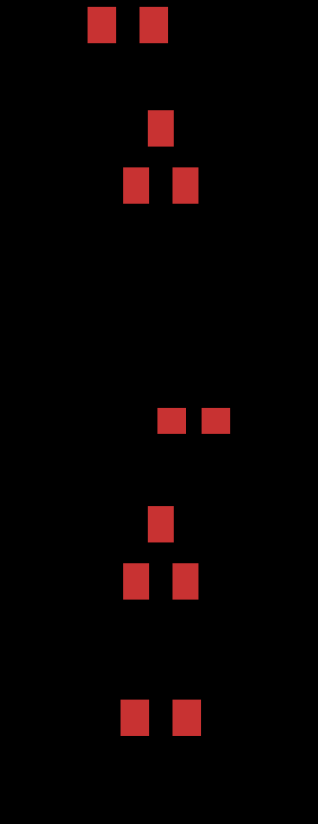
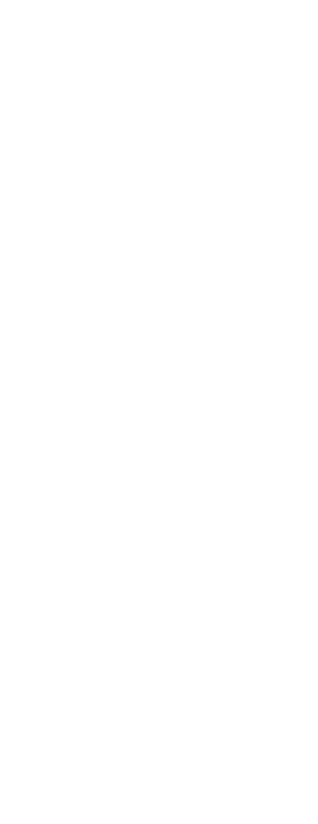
part: (127, 25) -> none
part: (160, 156) -> none
part: (193, 420) -> none
part: (160, 552) -> none
part: (160, 717) -> none

